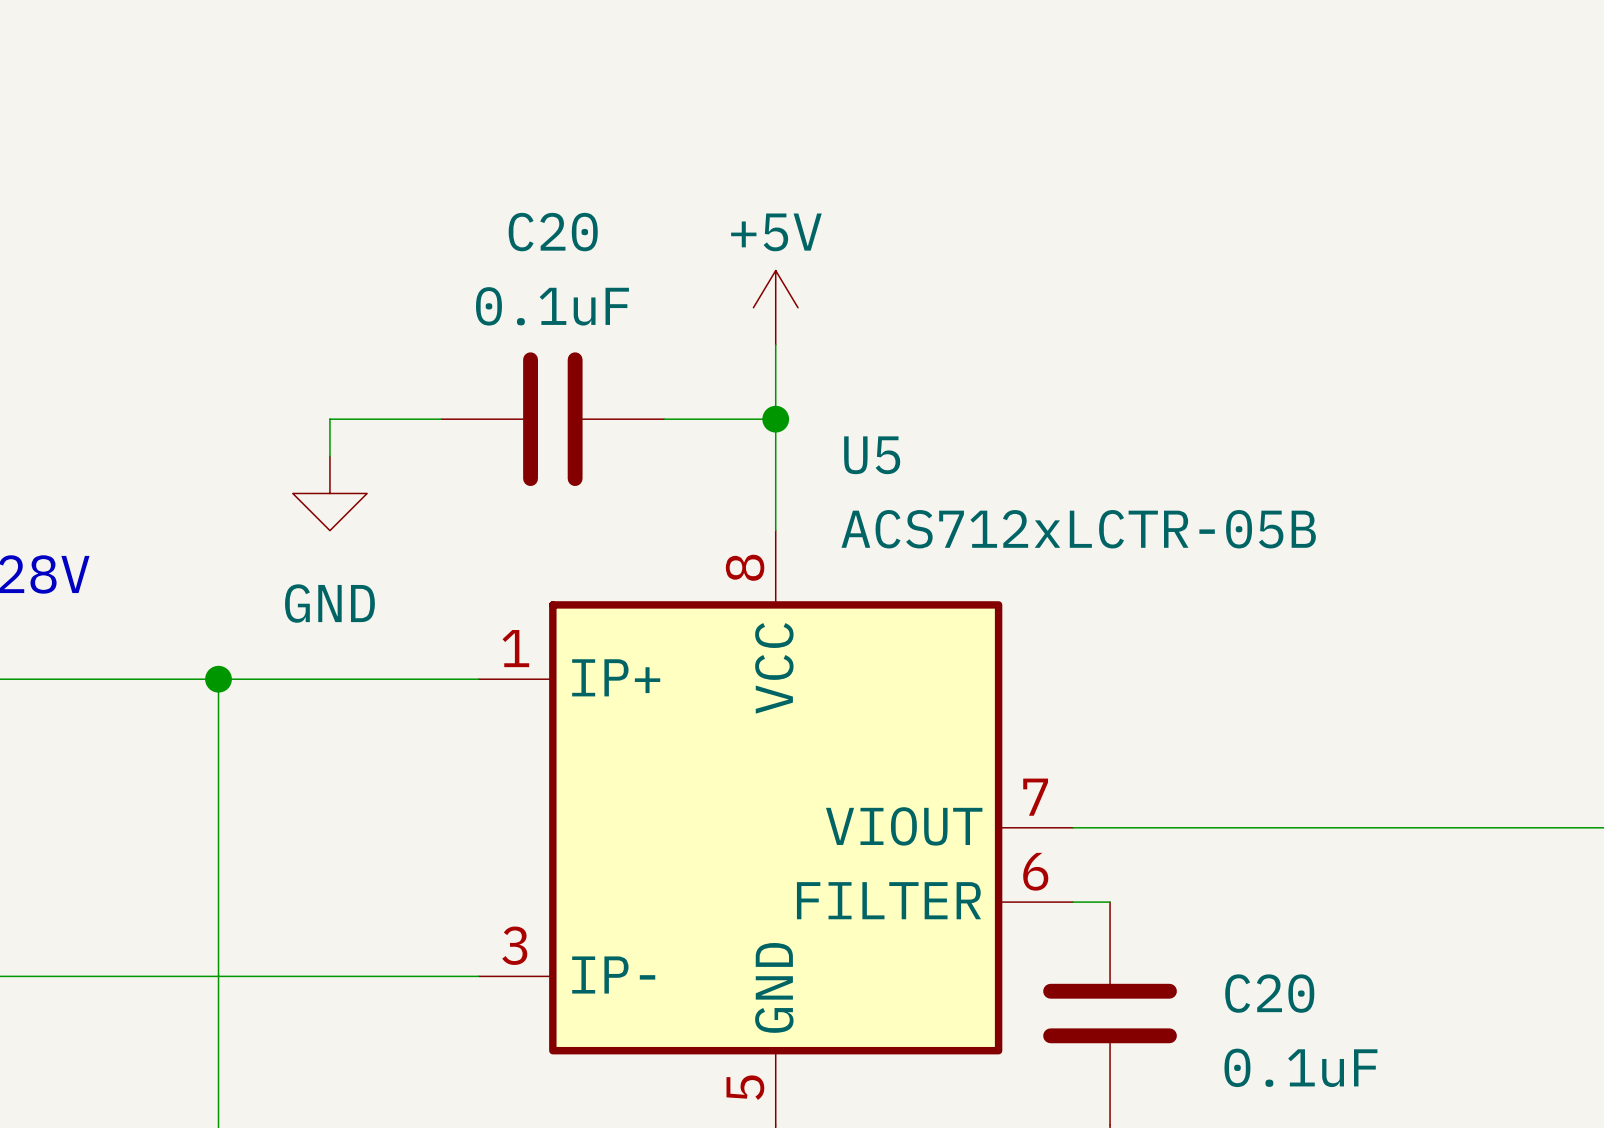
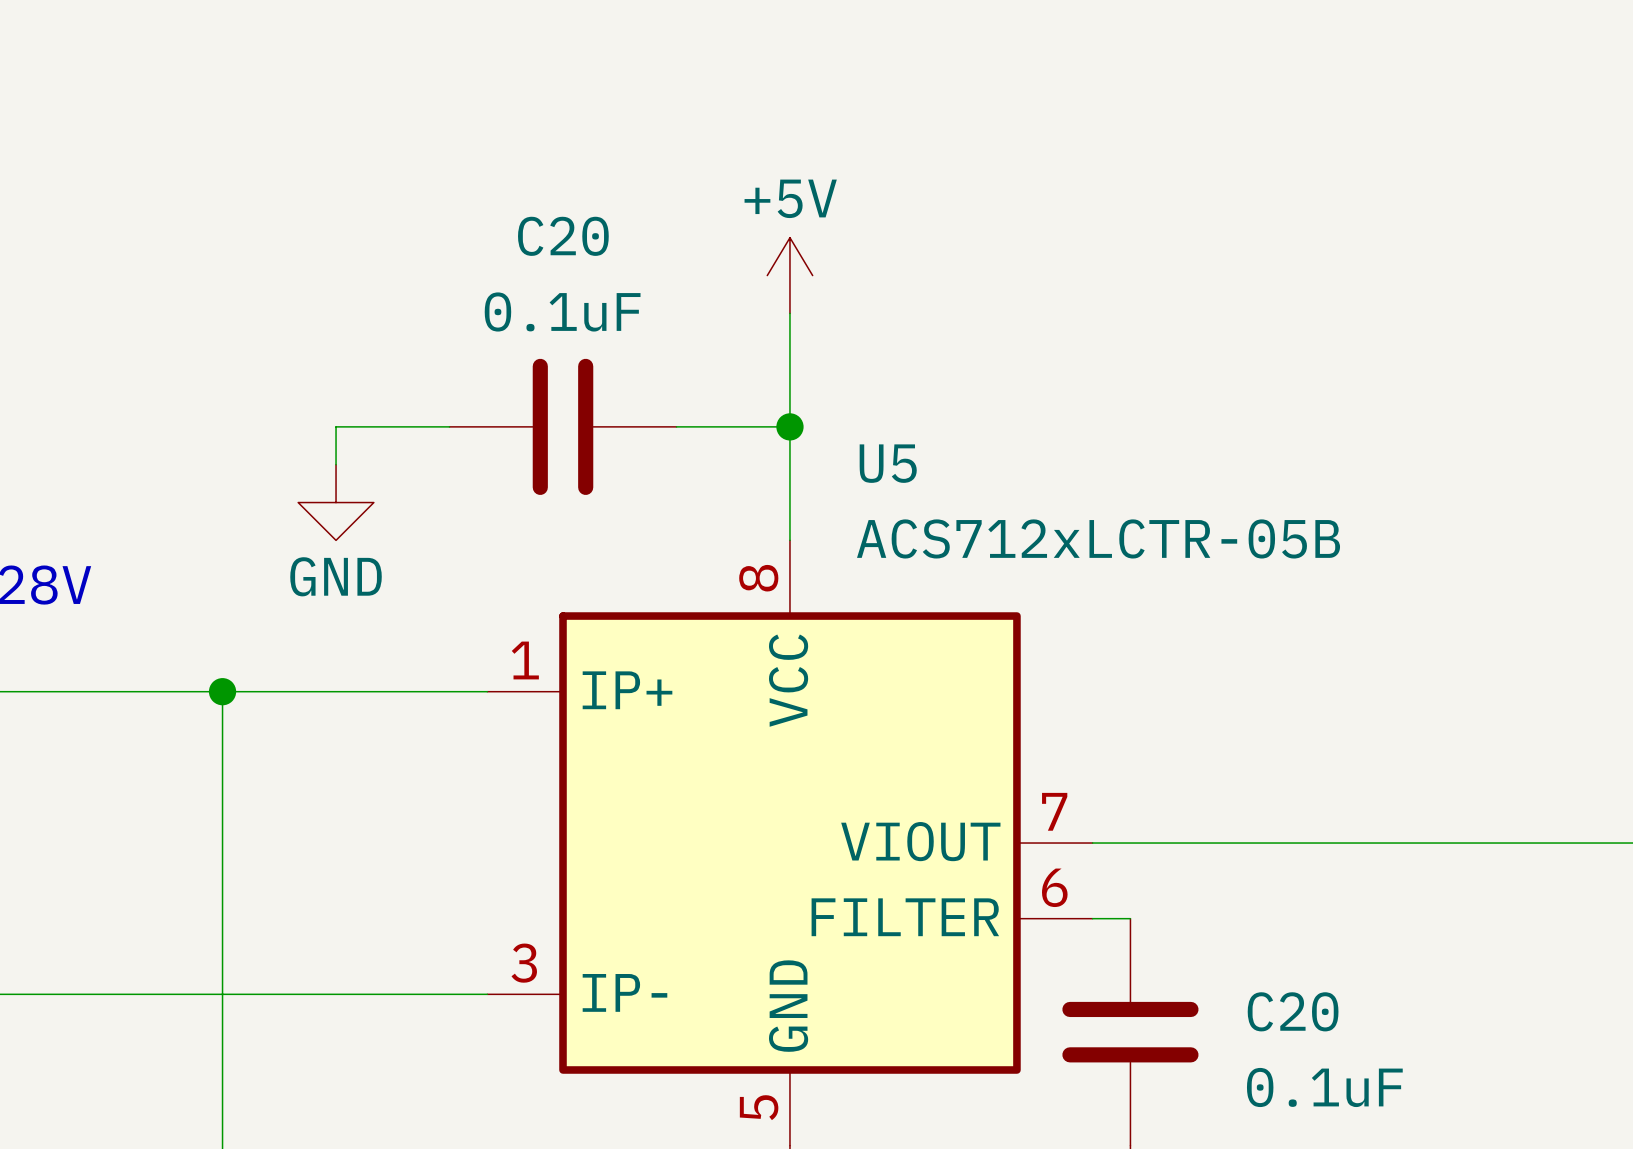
power symbol position: +5V (775, 307) -> +5V (789, 275)
power symbol text position: GND (329, 603) -> GND (336, 576)

